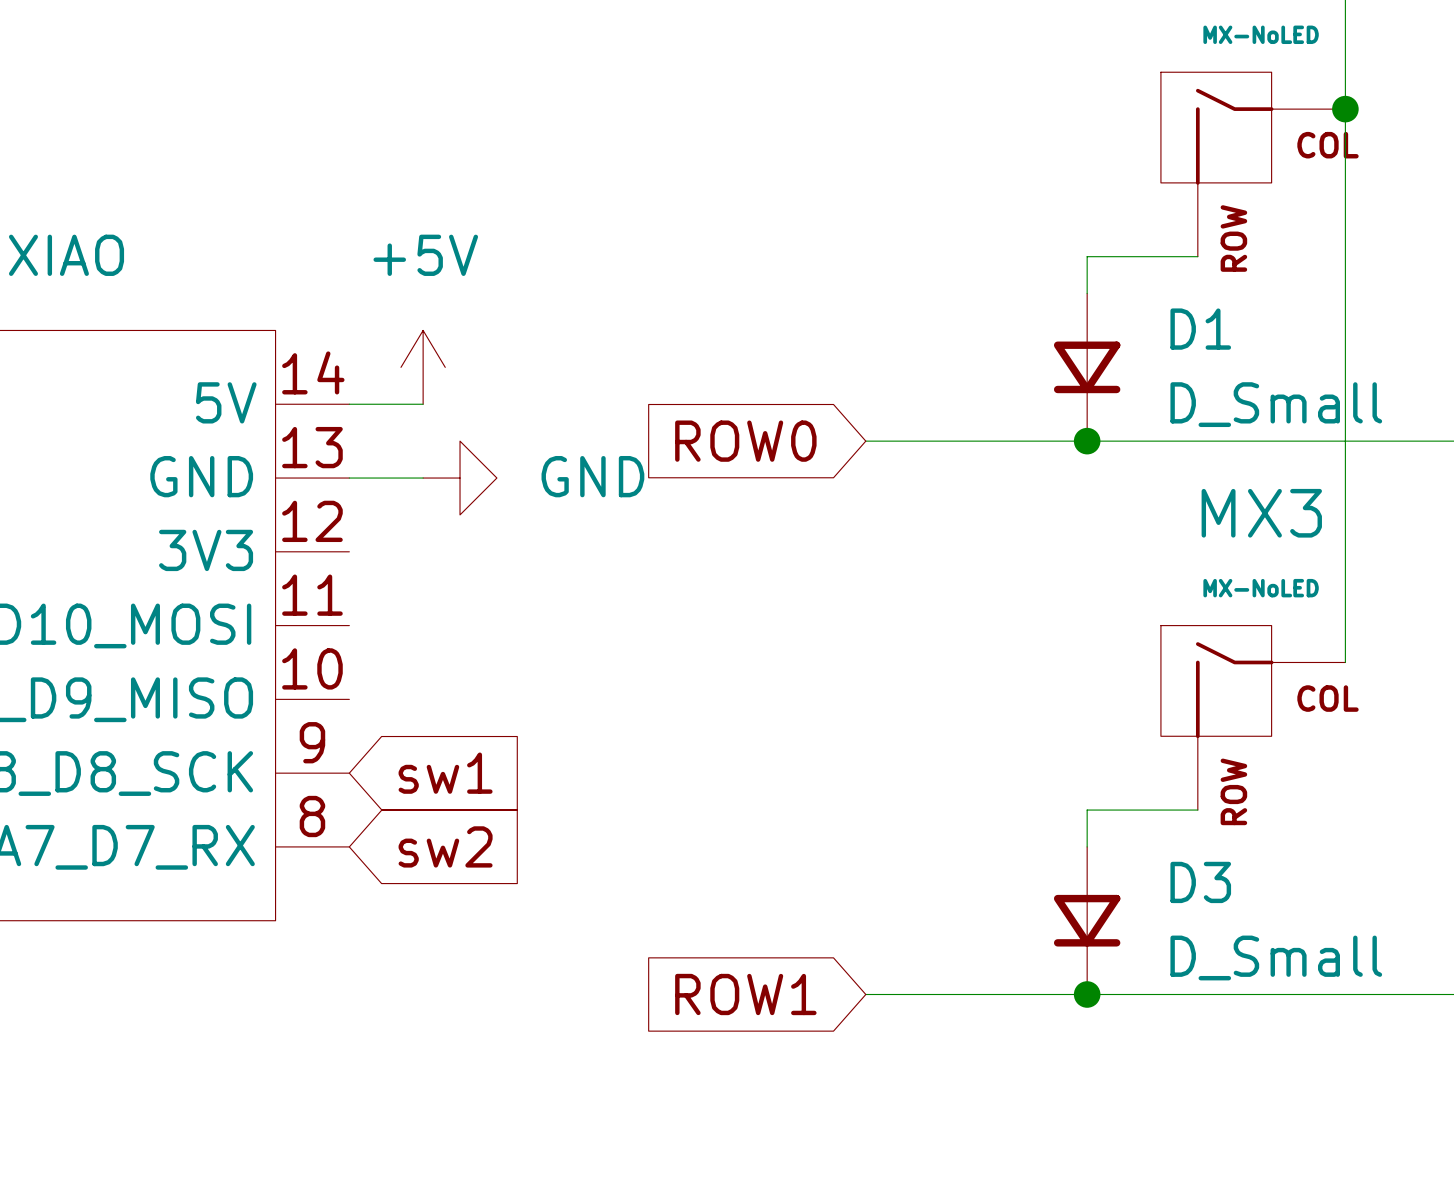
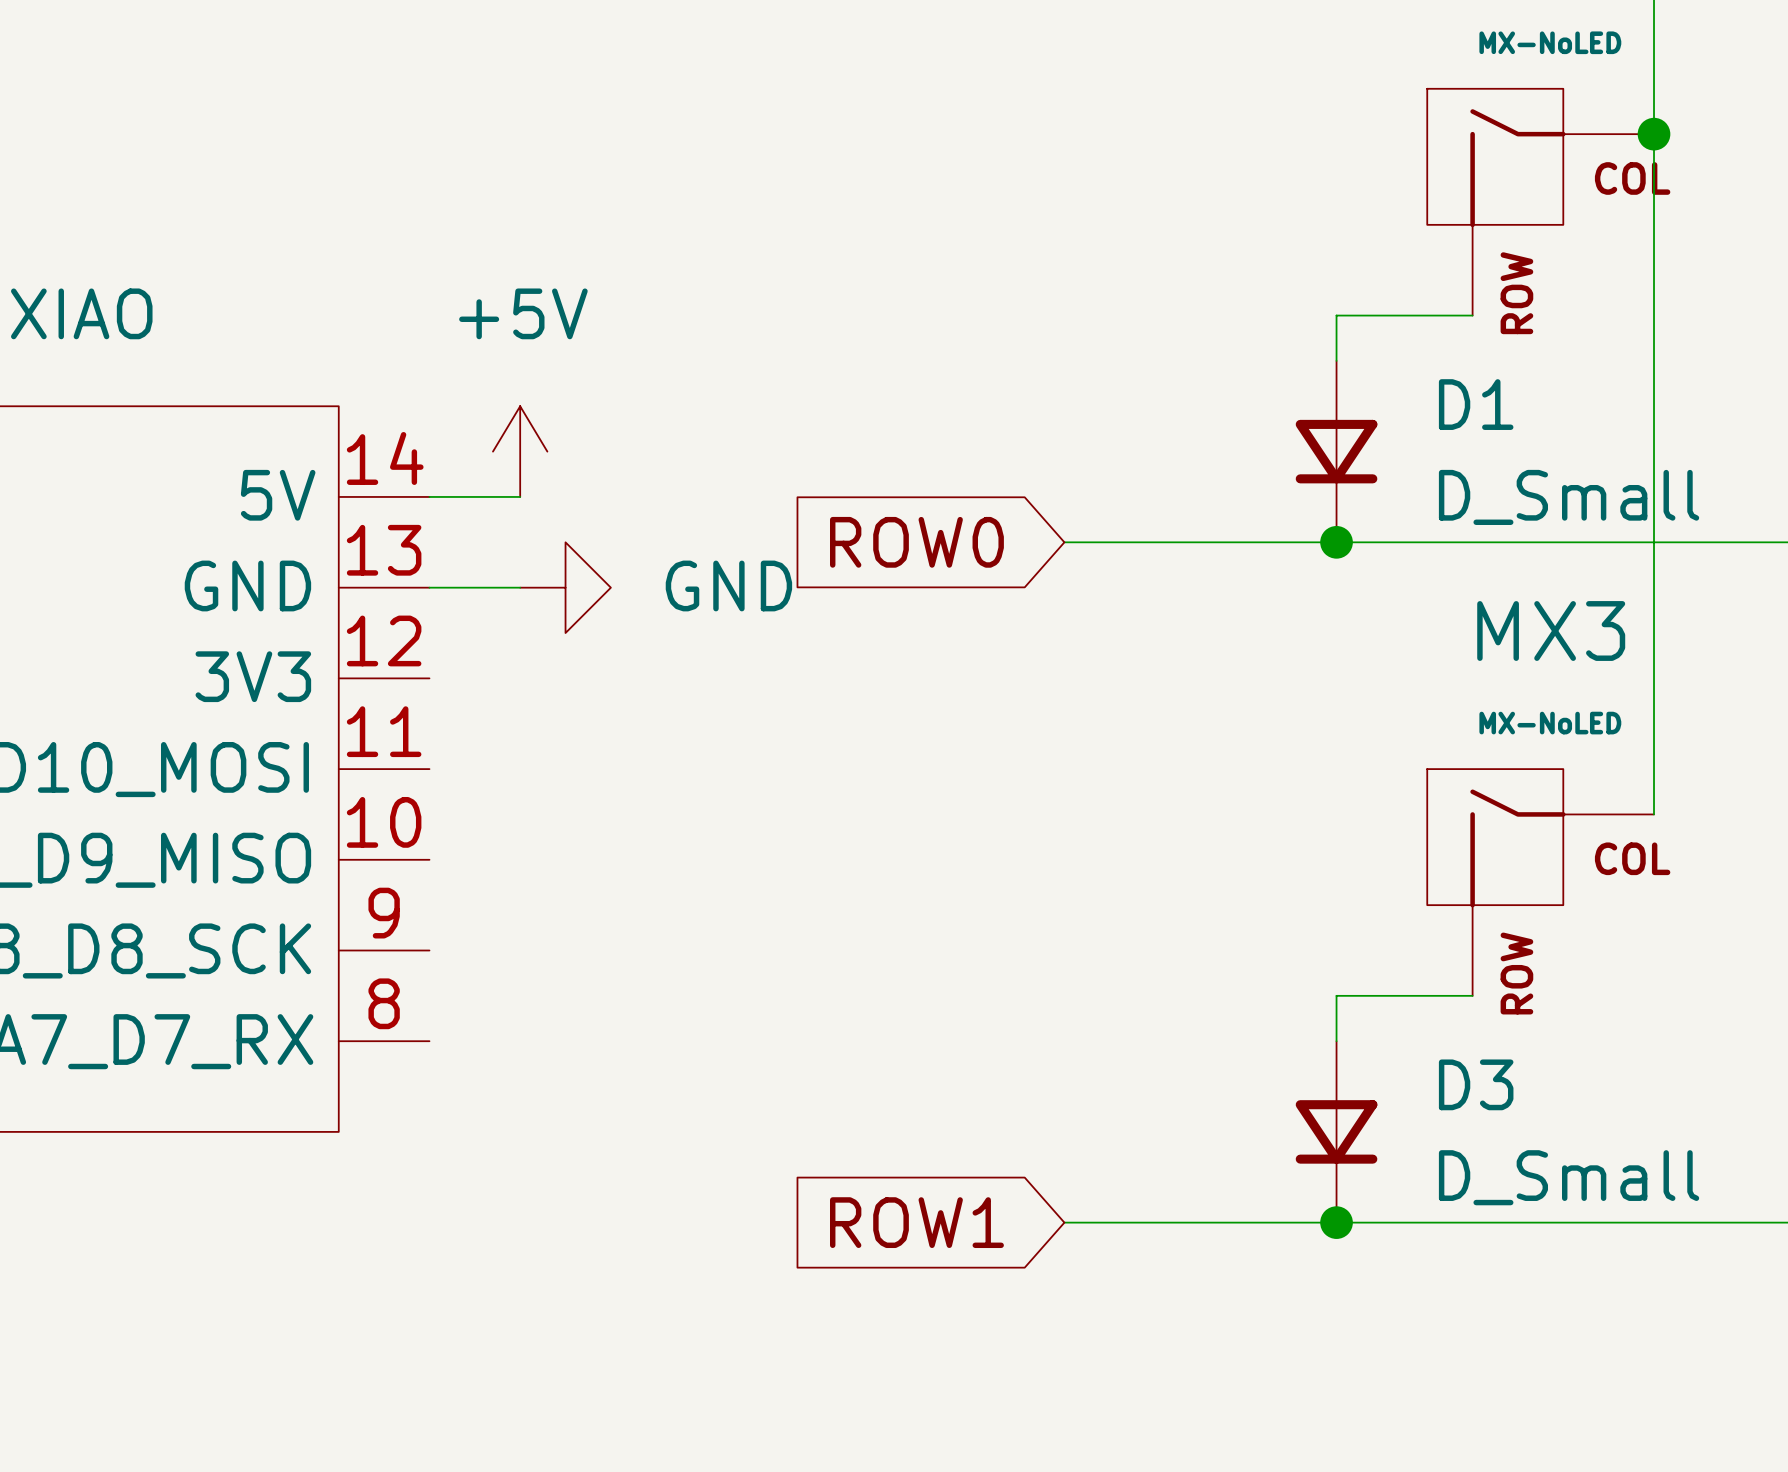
global label: sw1 (445, 773) -> none
global label: sw2 (445, 846) -> none

